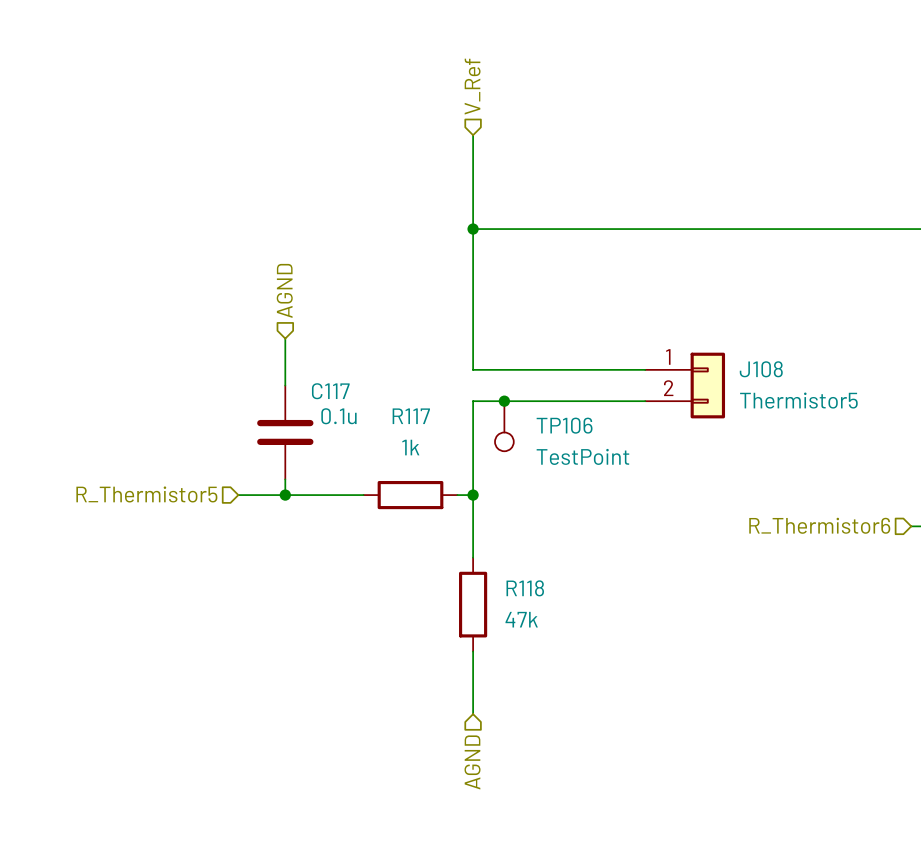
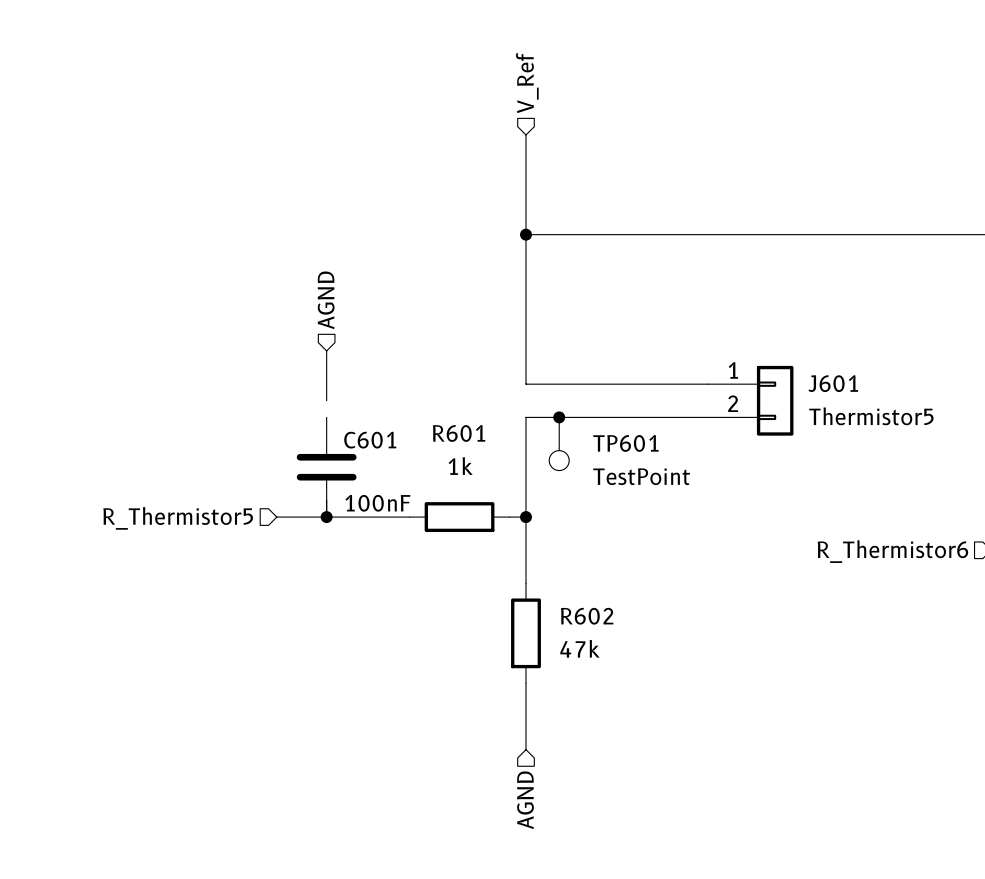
J108 name: J108 (761, 369) -> J601 (833, 383)
R117 name: R117 (411, 416) -> R601 (459, 433)
TP106 name: TP106 (564, 425) -> TP601 (625, 443)
C117: 0.1u (285, 432) -> none
C601: none -> 100nF (326, 467)
R118 name: R118 (525, 588) -> R602 (587, 616)

